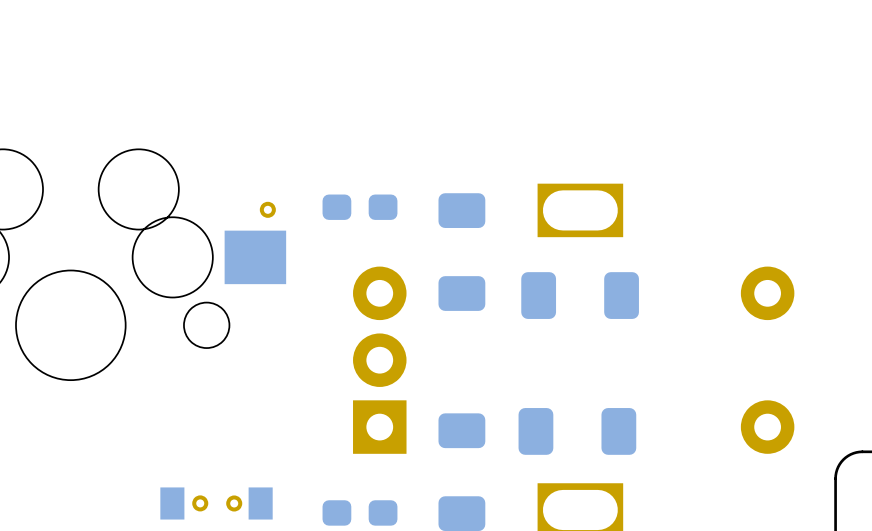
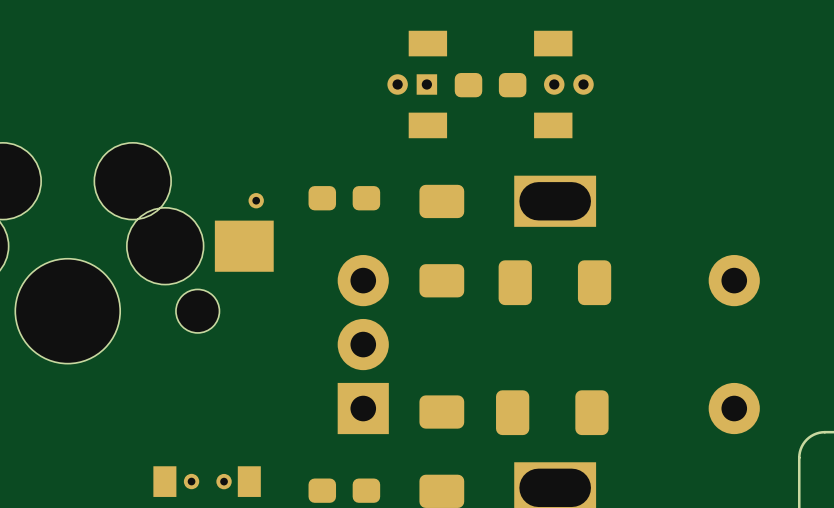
part: none -> (490, 84)

